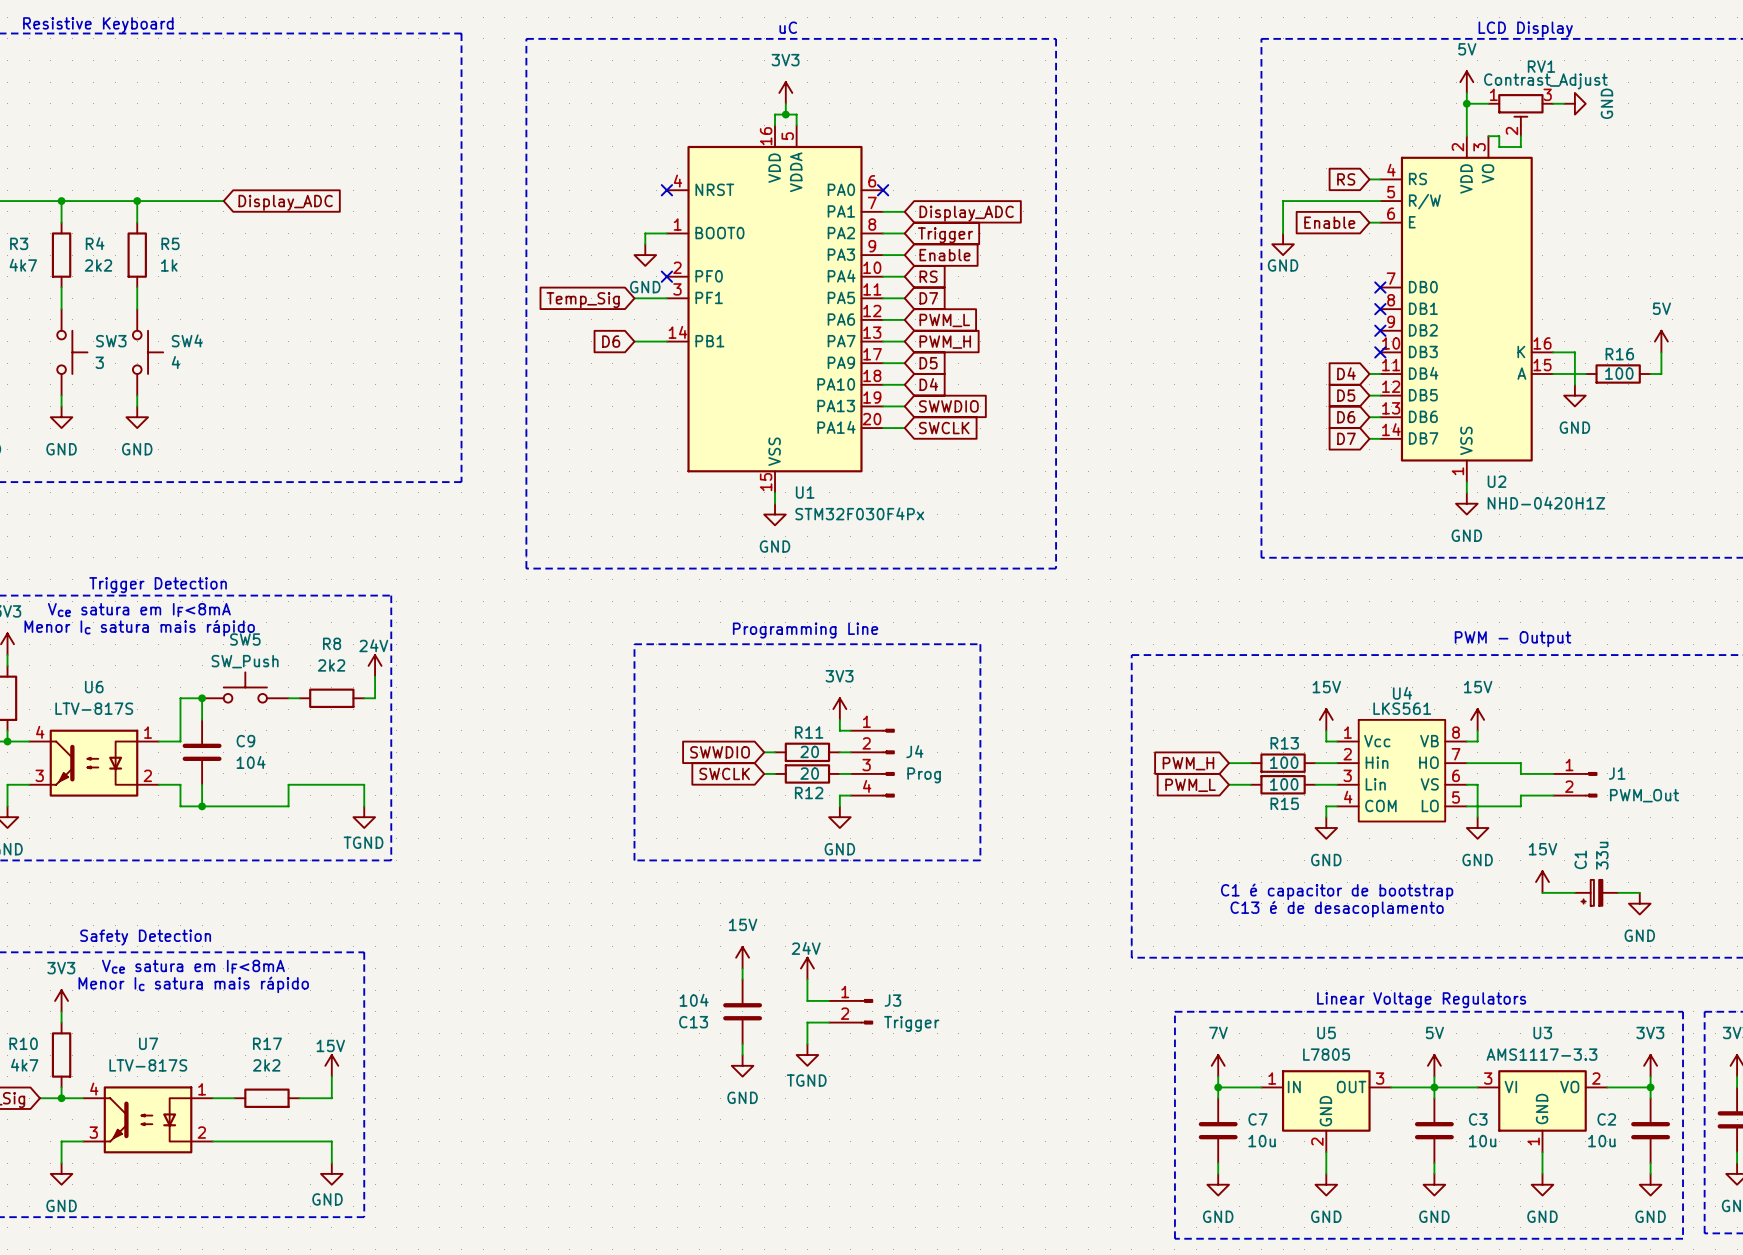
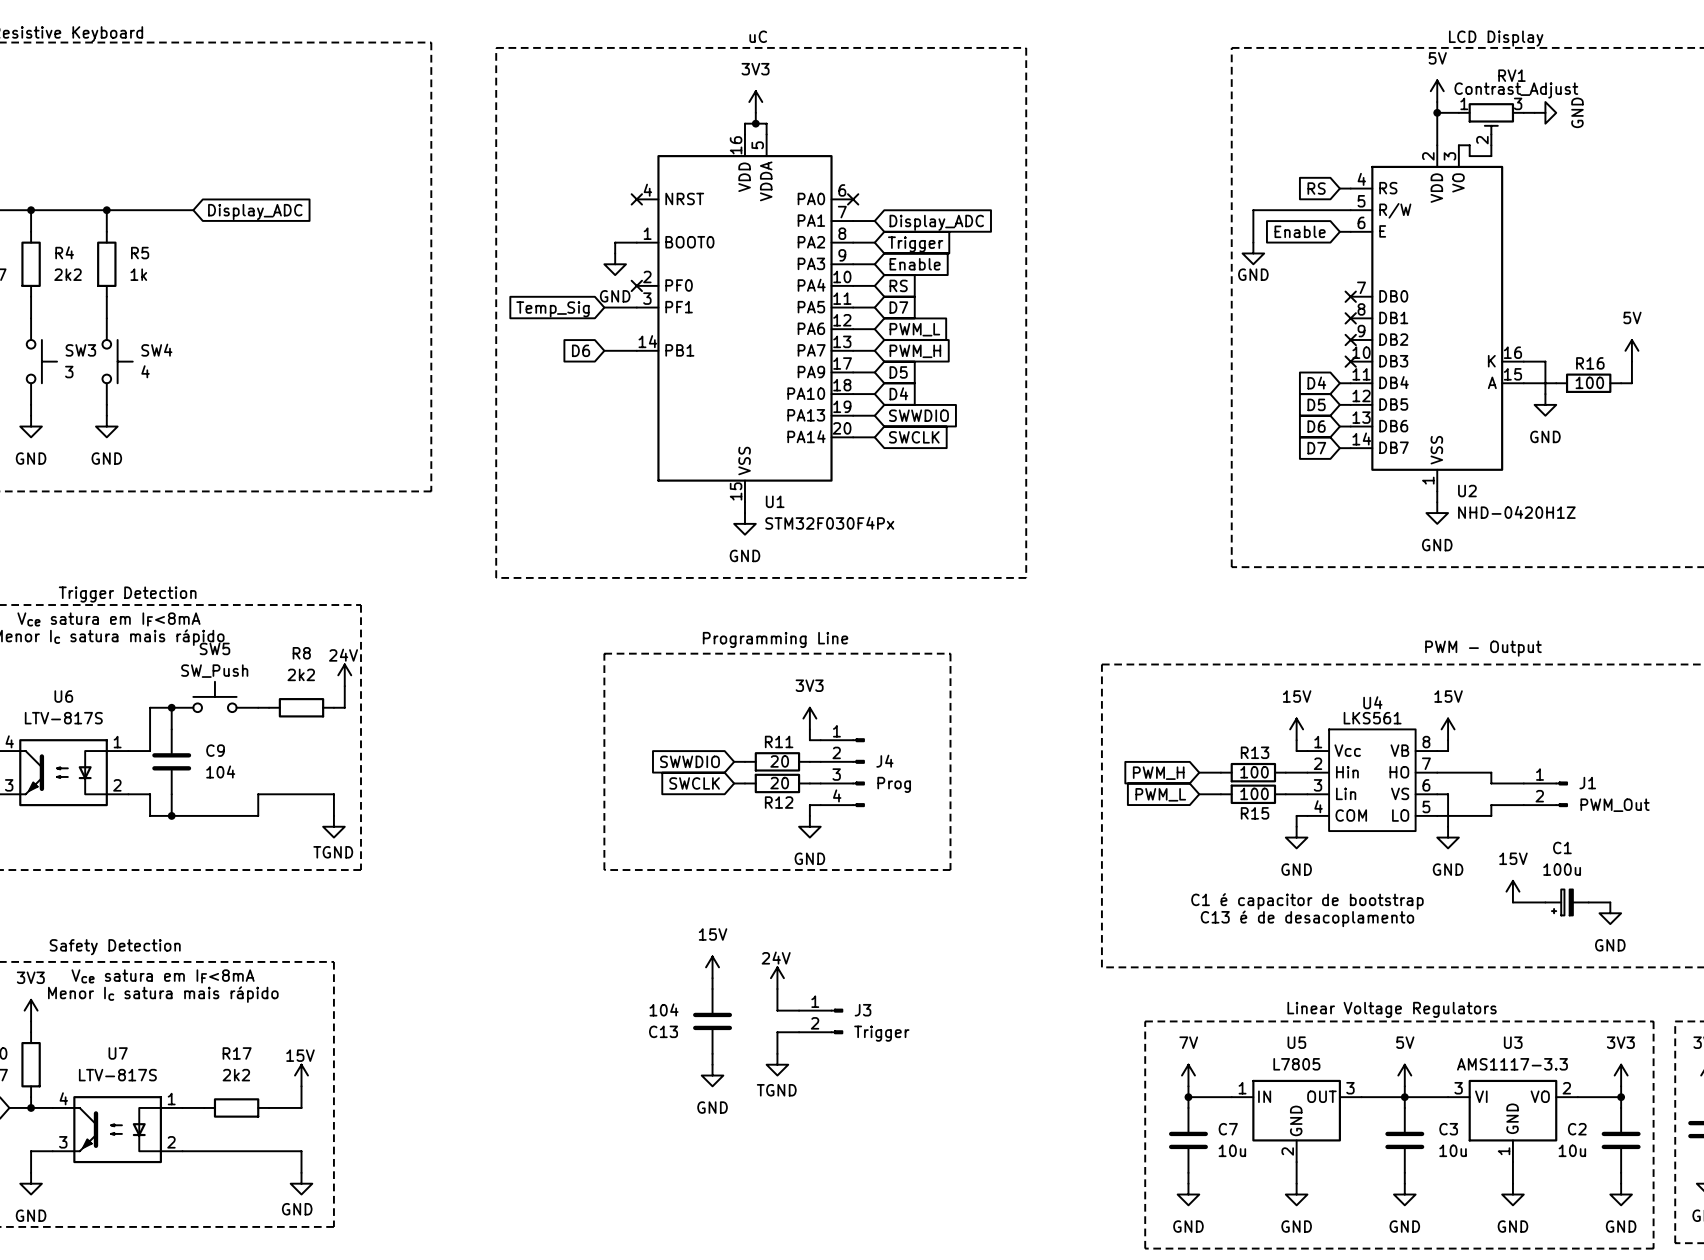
C1 value: 33u (1602, 855) -> 100u (1562, 869)
C1 name rotation: 0° (1580, 859) -> 90° clockwise (1562, 847)

